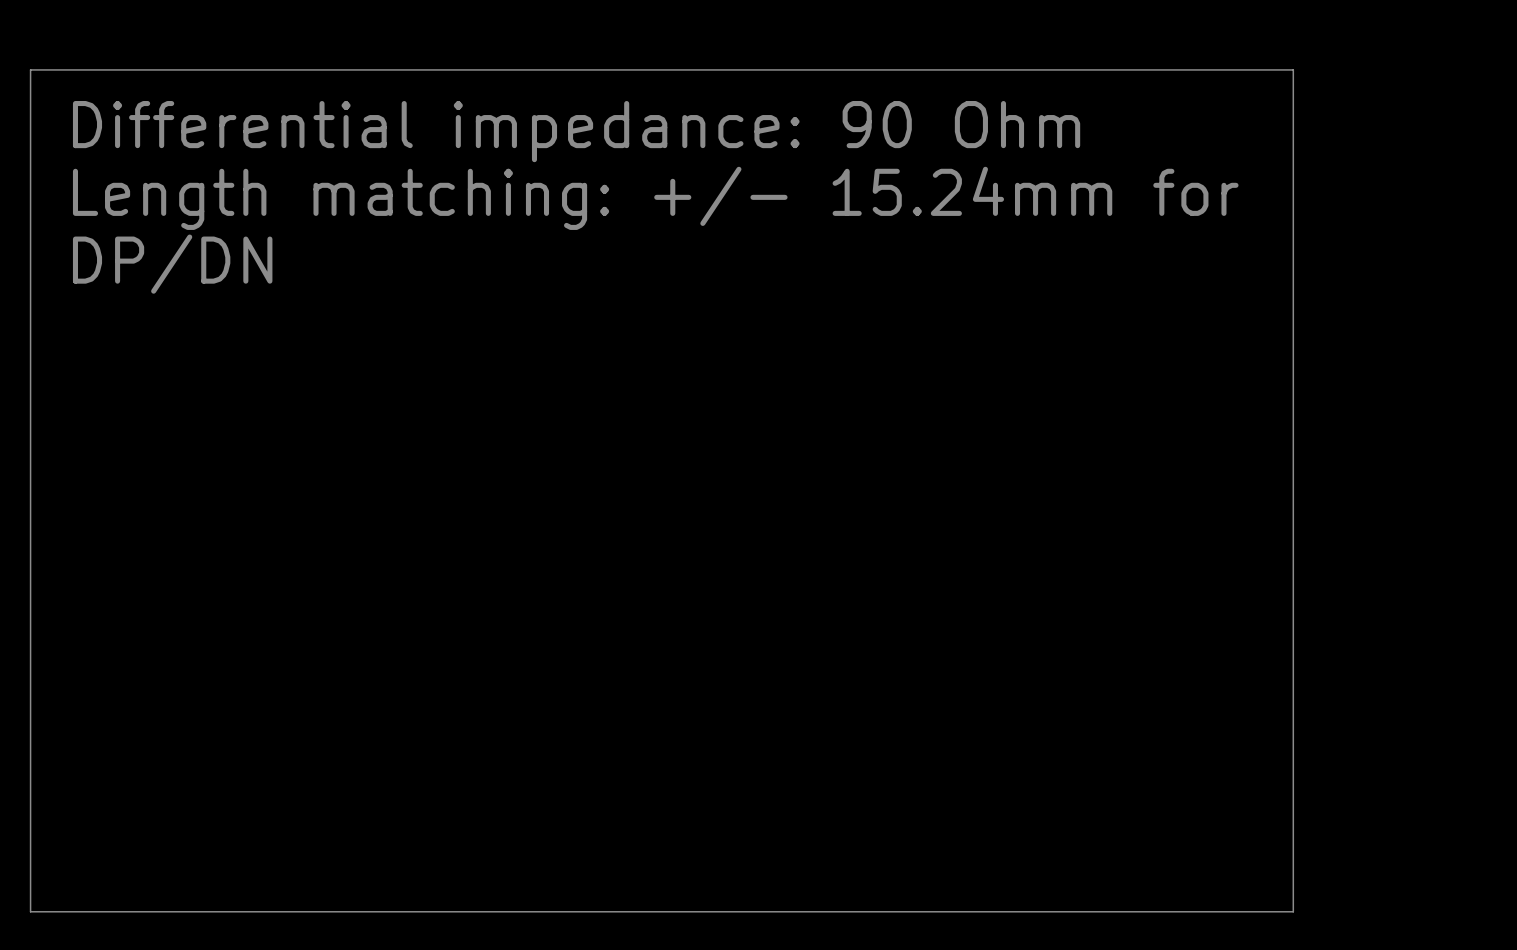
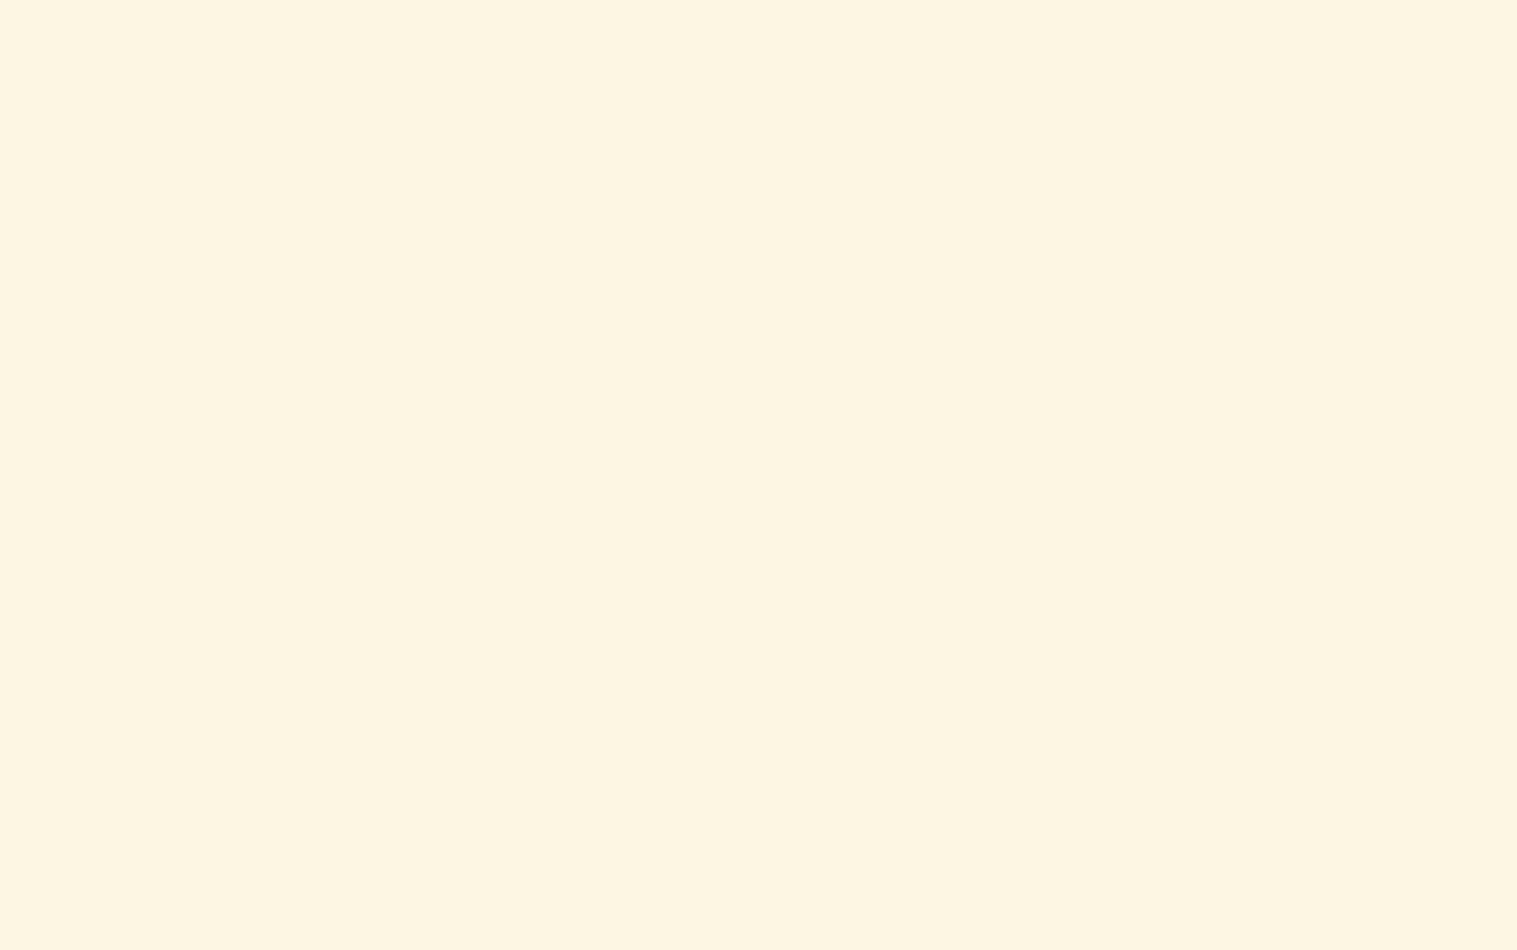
line: (30, 69) (1293, 69) (1293, 911) (30, 911) (30, 69) -> none
text: Differential impedance: 90 Ohm (576, 131) -> none
text: Length matching: +/- 15.24mm for (655, 198) -> none
text: DP/DN (172, 264) -> none

